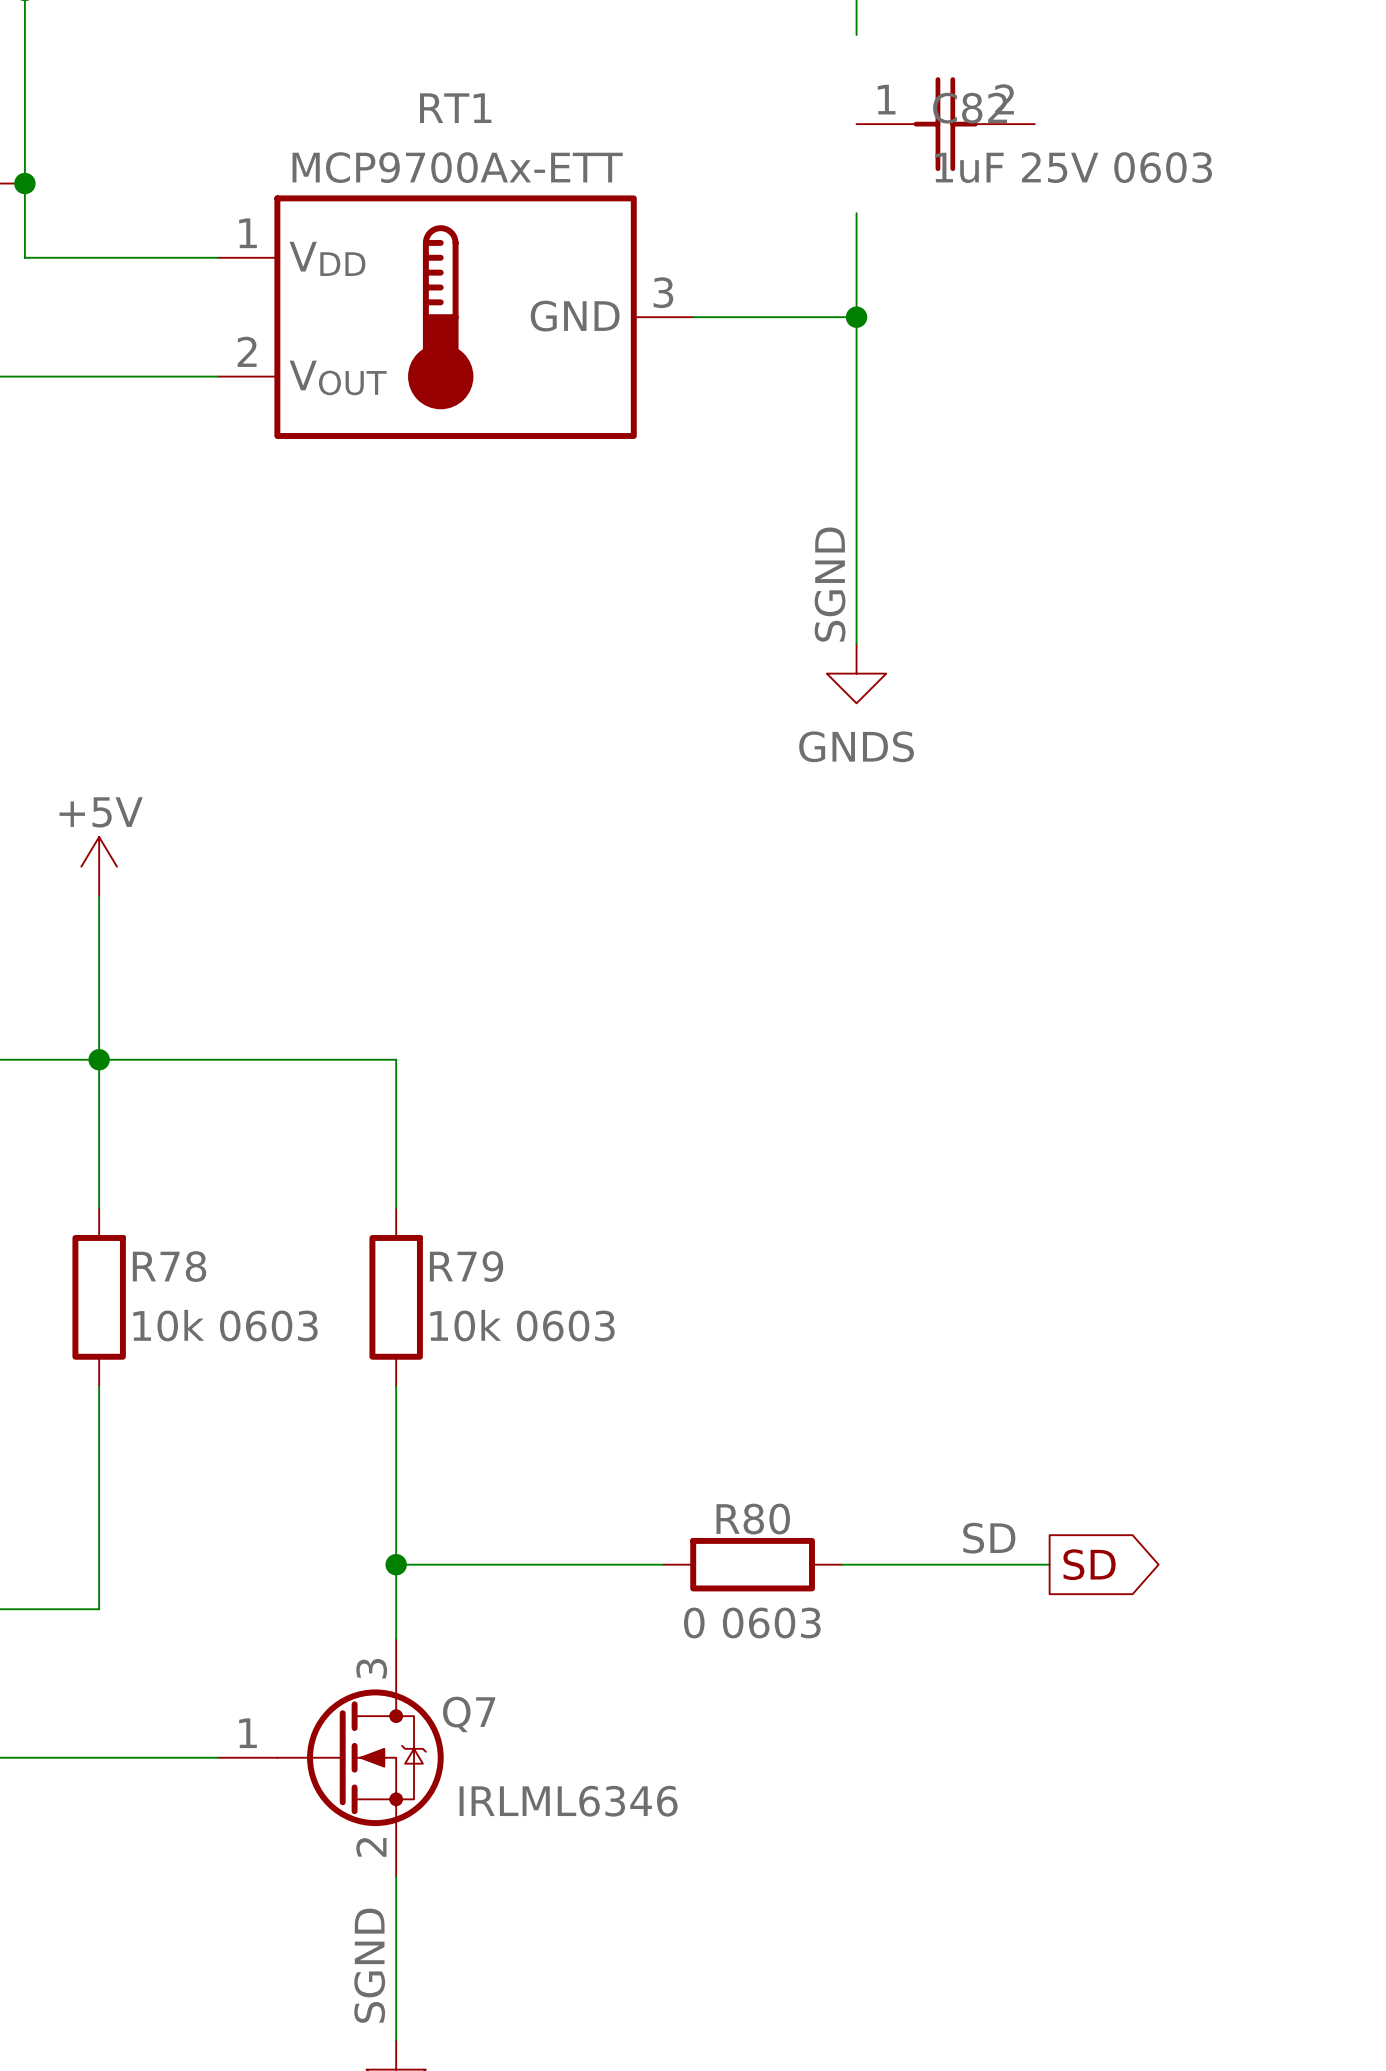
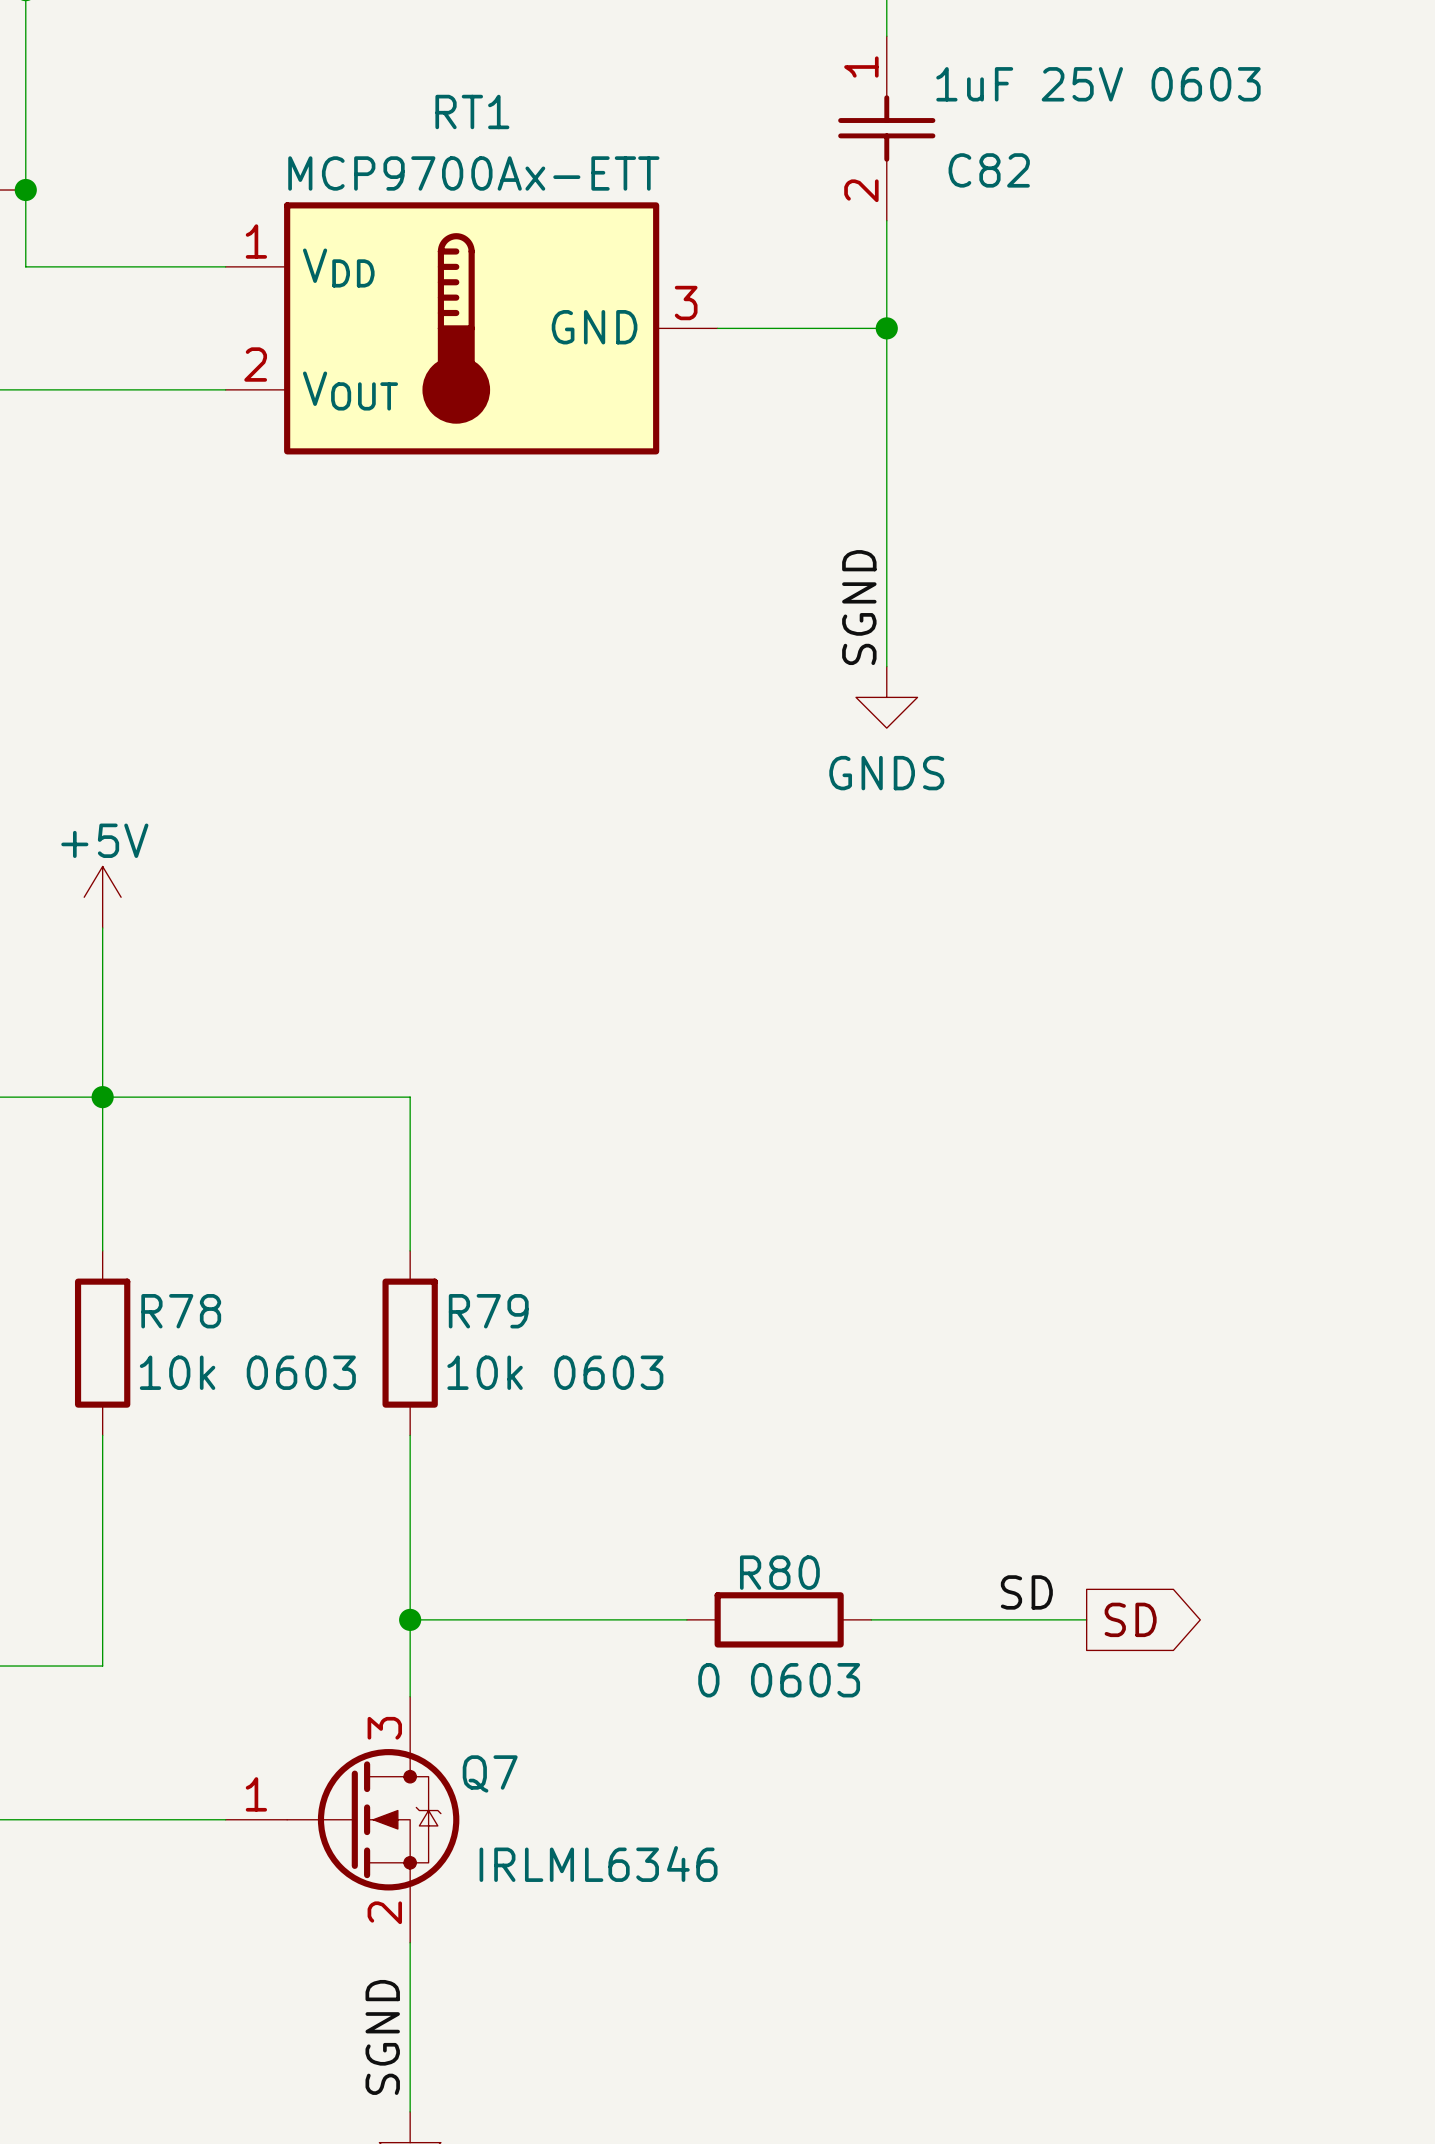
C82 name position: C82 (970, 108) -> C82 (989, 170)
C82 rotation: 0° (945, 124) -> 90° clockwise (886, 128)
C82 value position: 1uF 25V 0603 (1073, 167) -> 1uF 25V 0603 (1098, 84)

